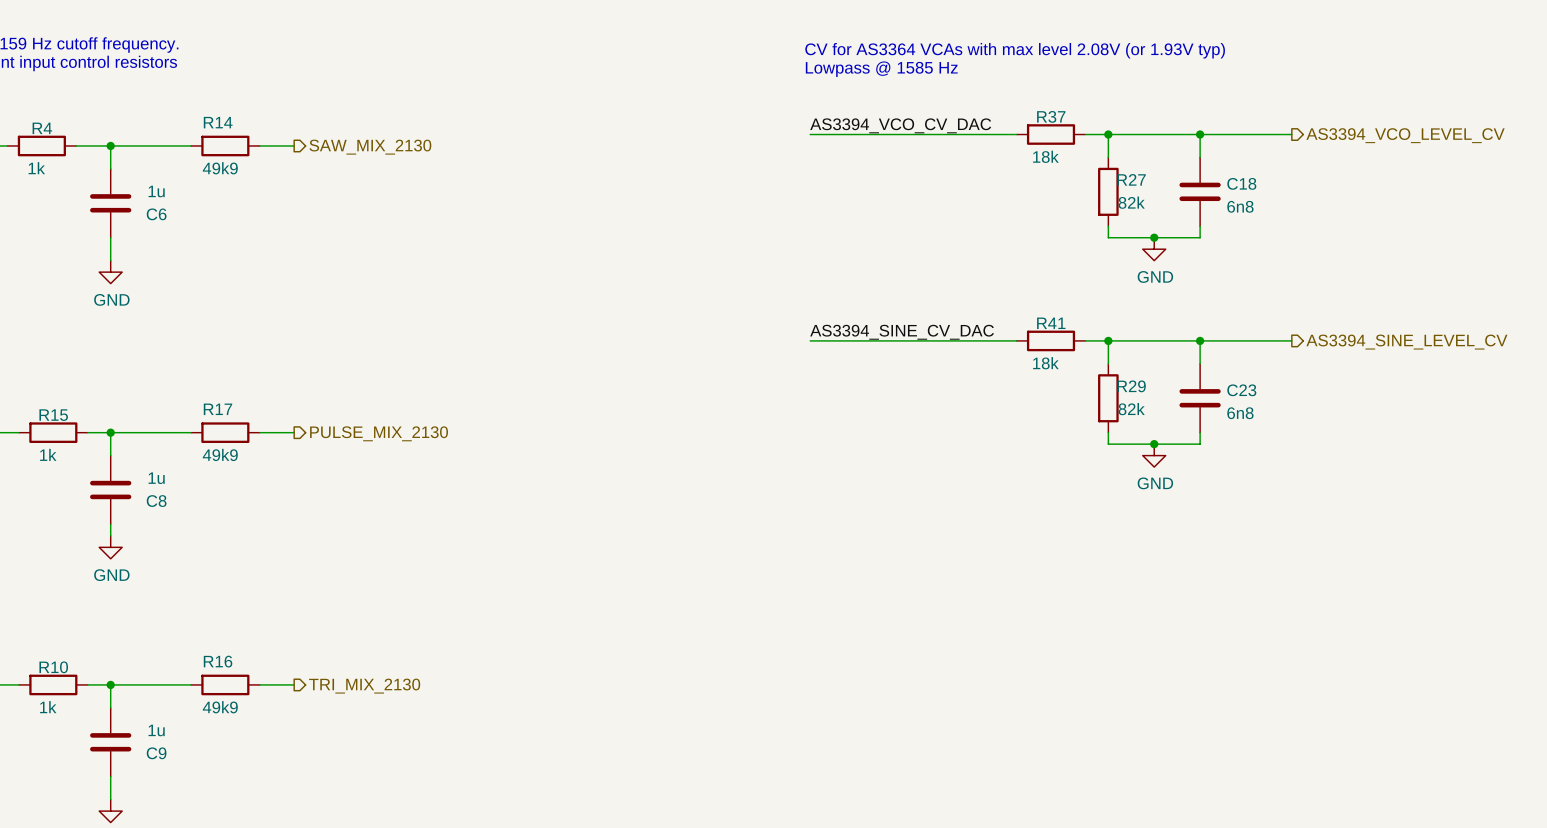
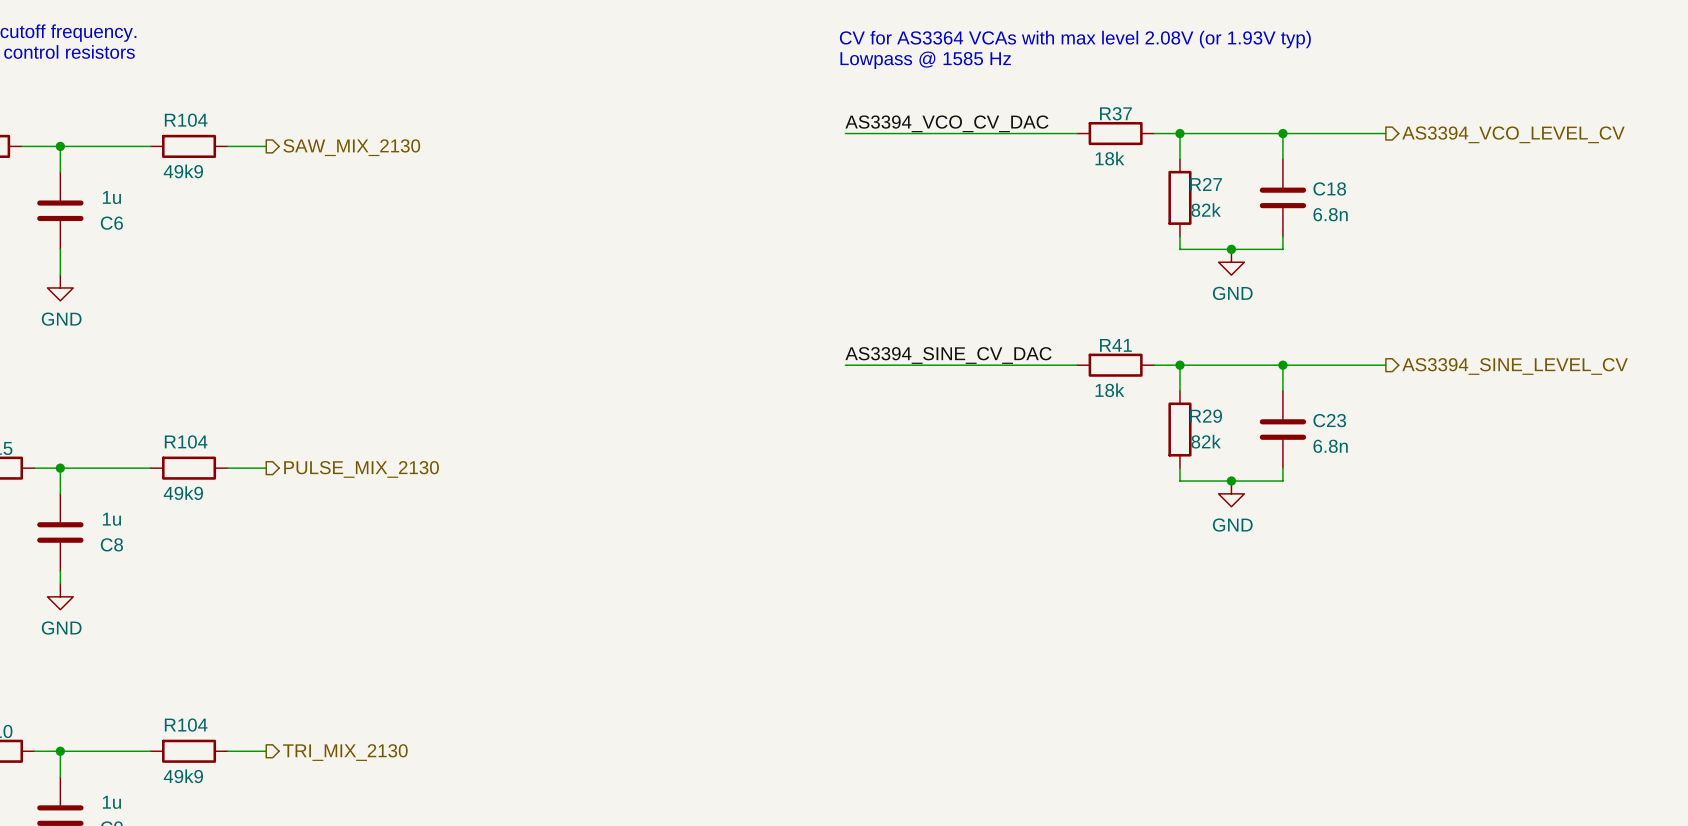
R14 name: R14 (218, 122) -> R104 (186, 120)
C18 value: 6n8 (1240, 206) -> 6.8n (1330, 214)
R17 name: R17 (217, 409) -> R104 (186, 441)
C23 value: 6n8 (1240, 413) -> 6.8n (1330, 446)
R16 name: R16 (218, 661) -> R104 (186, 725)

